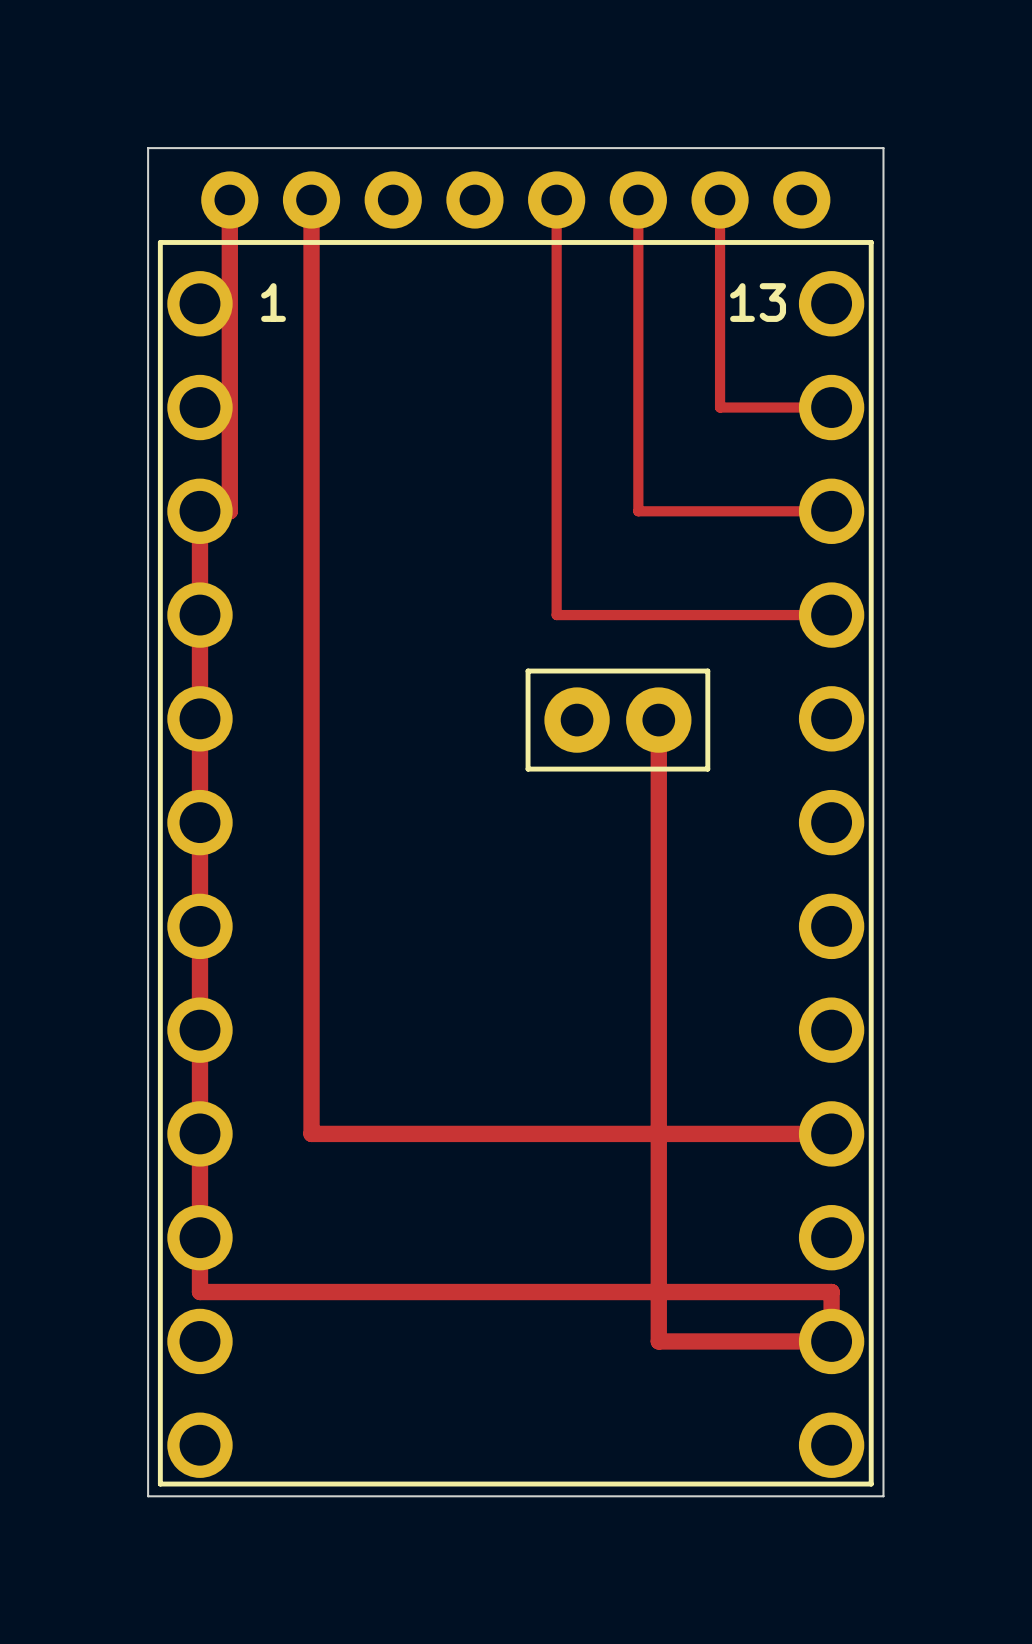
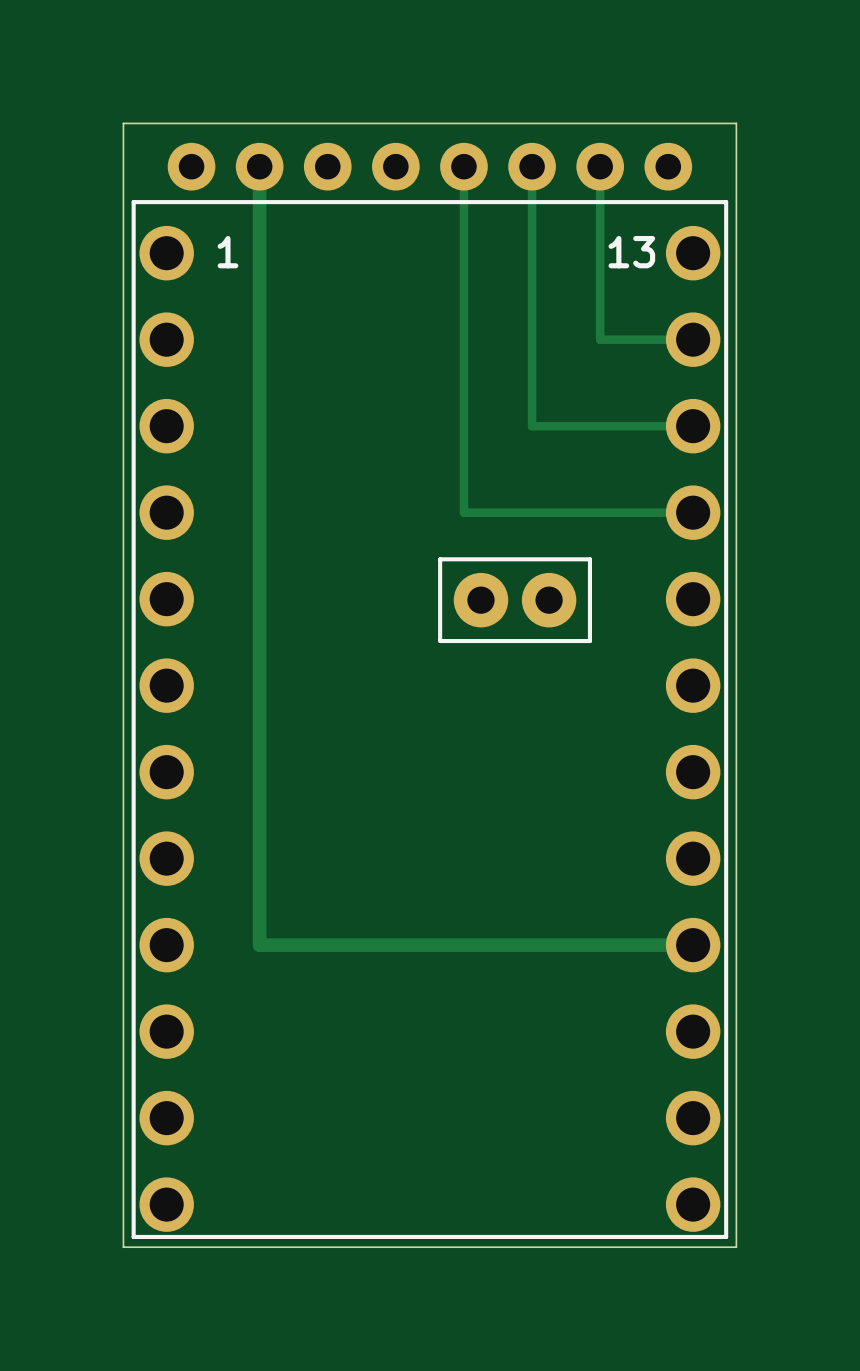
track: (229, 199) (229, 511) (199, 511) (199, 1292) (831, 1292) (831, 1341) (658, 1341) (658, 720) -> none

